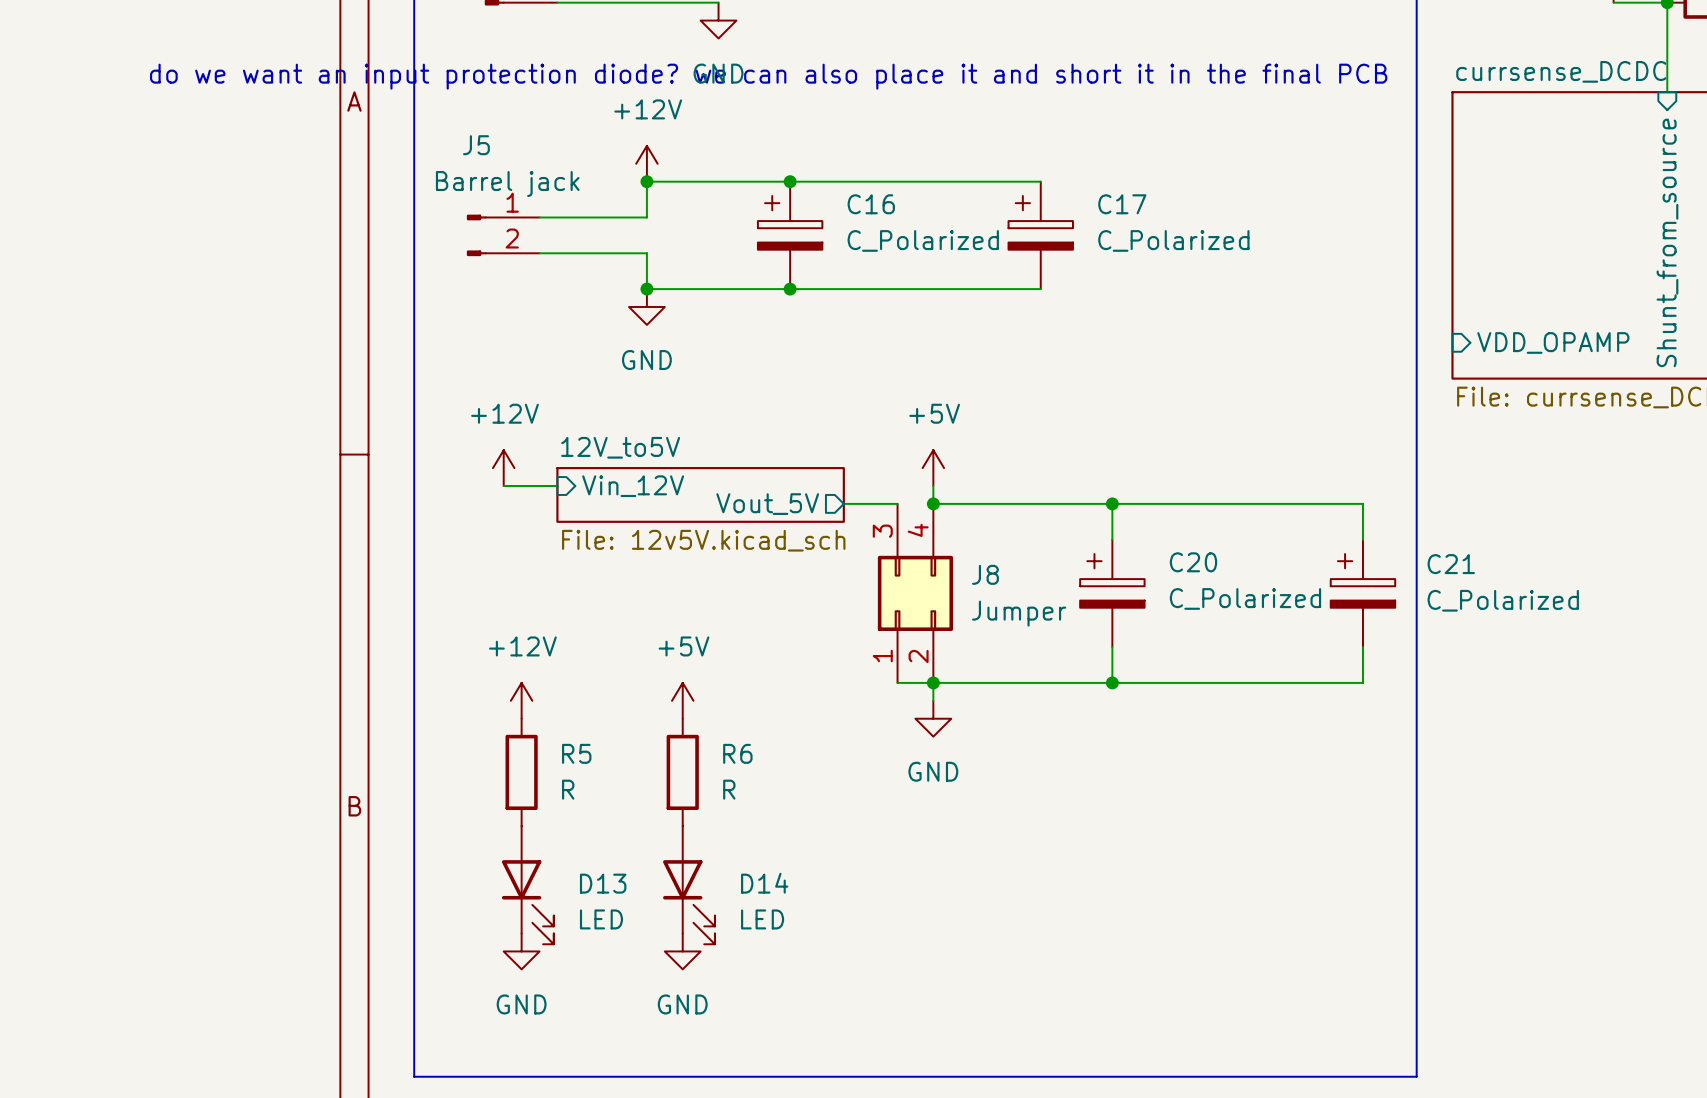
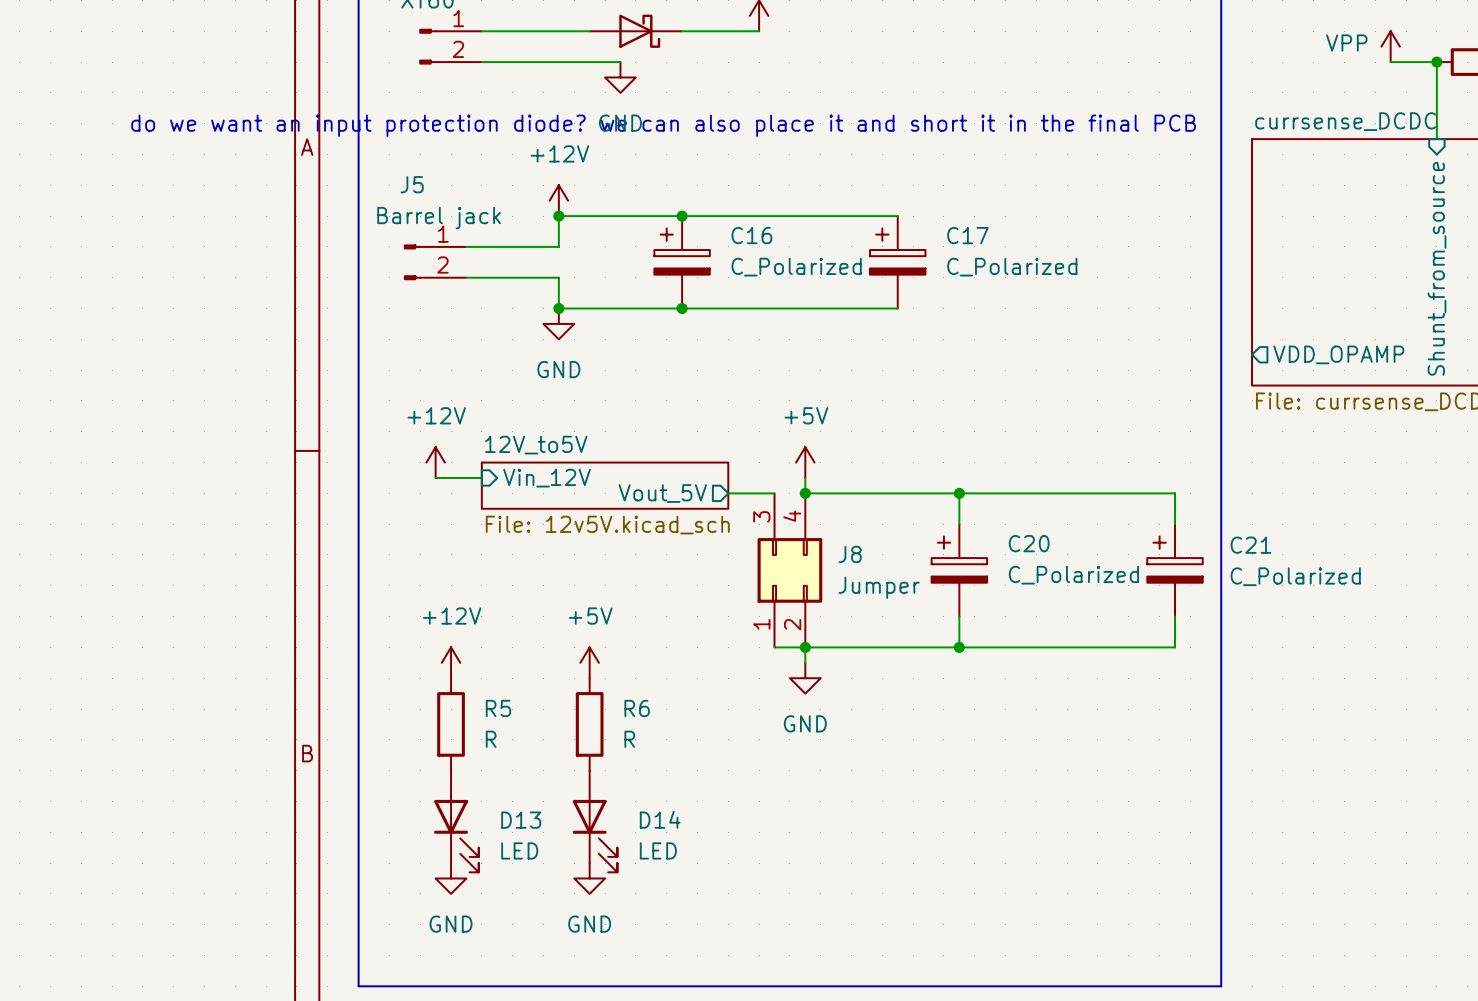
sheet pin shape: input (1553, 342) -> output (1338, 354)

